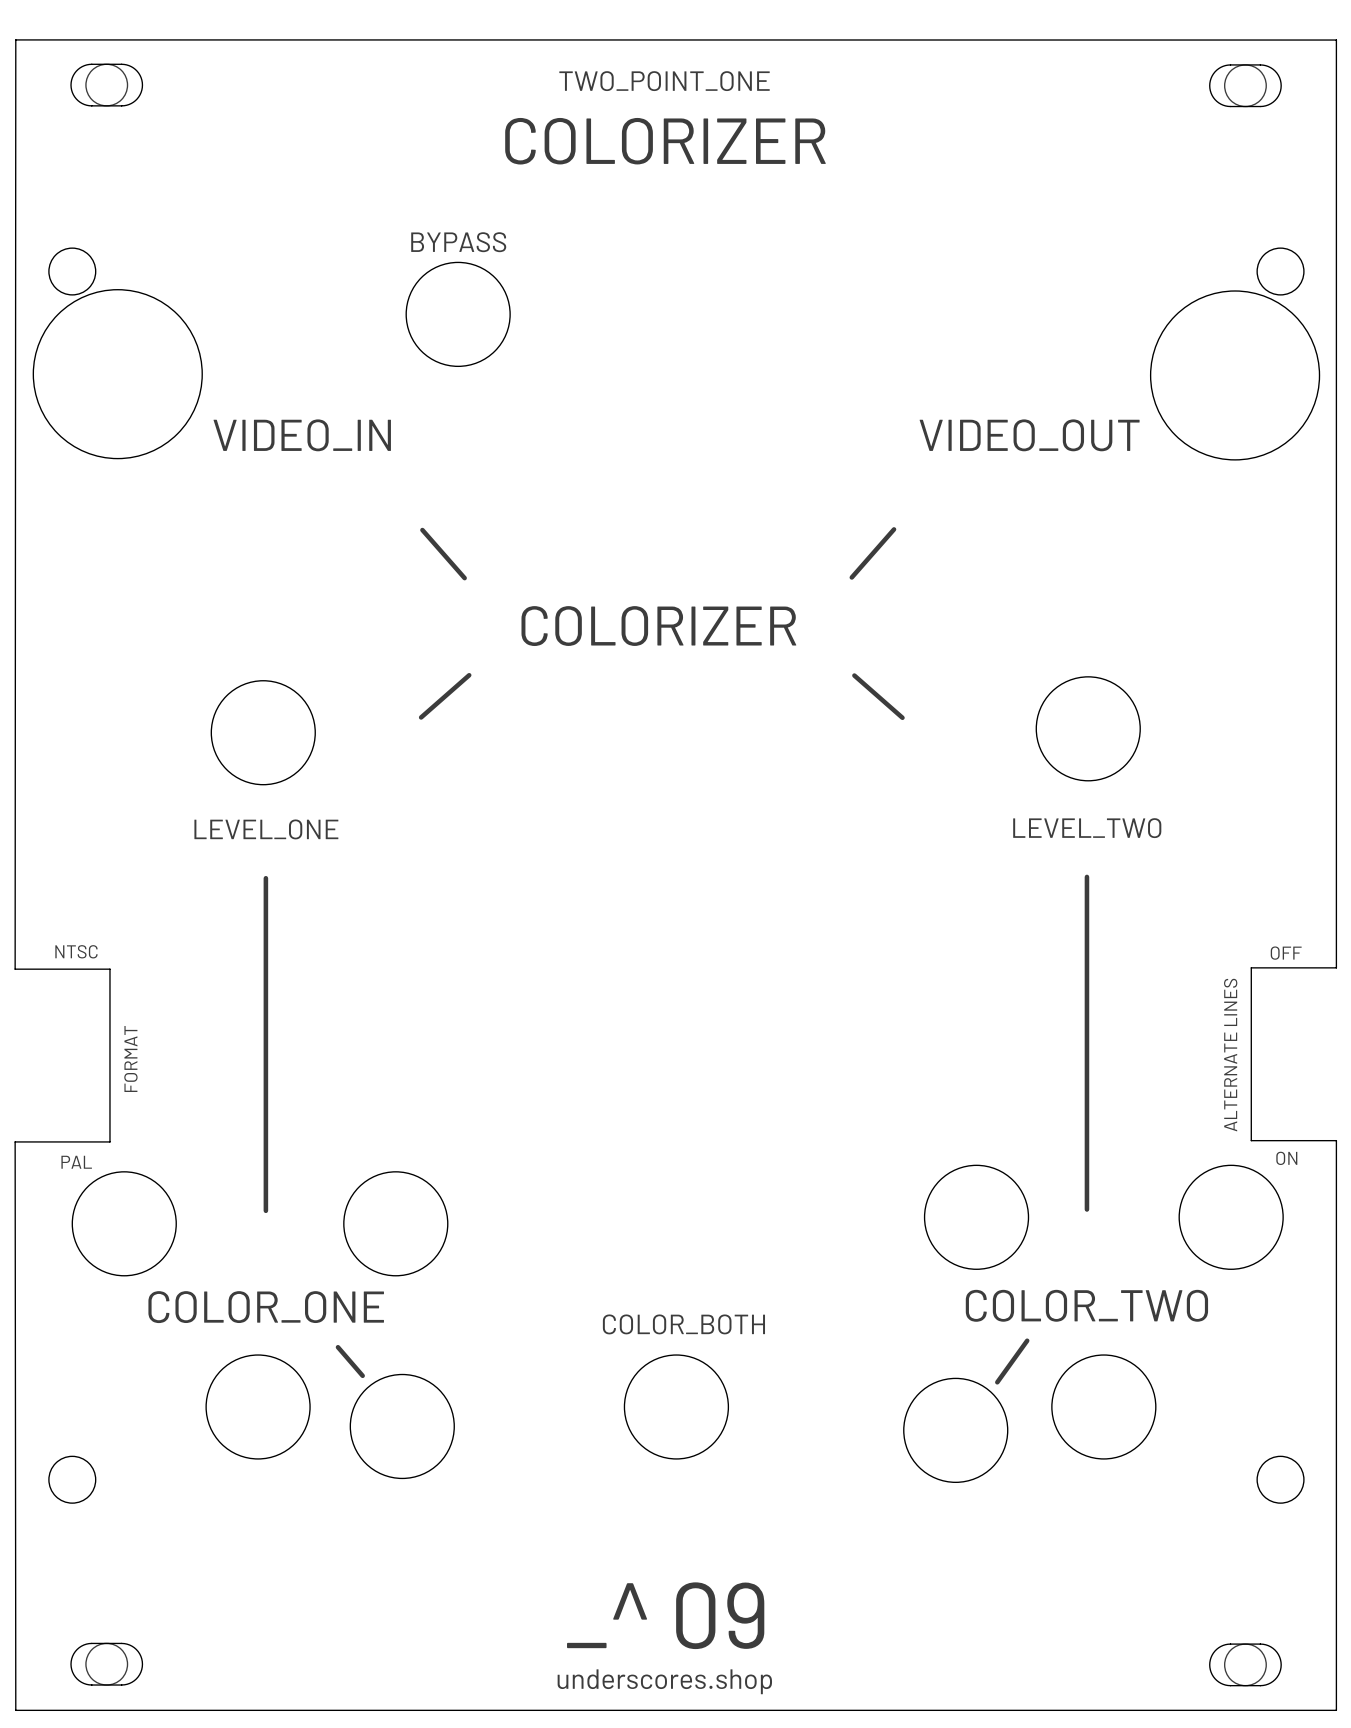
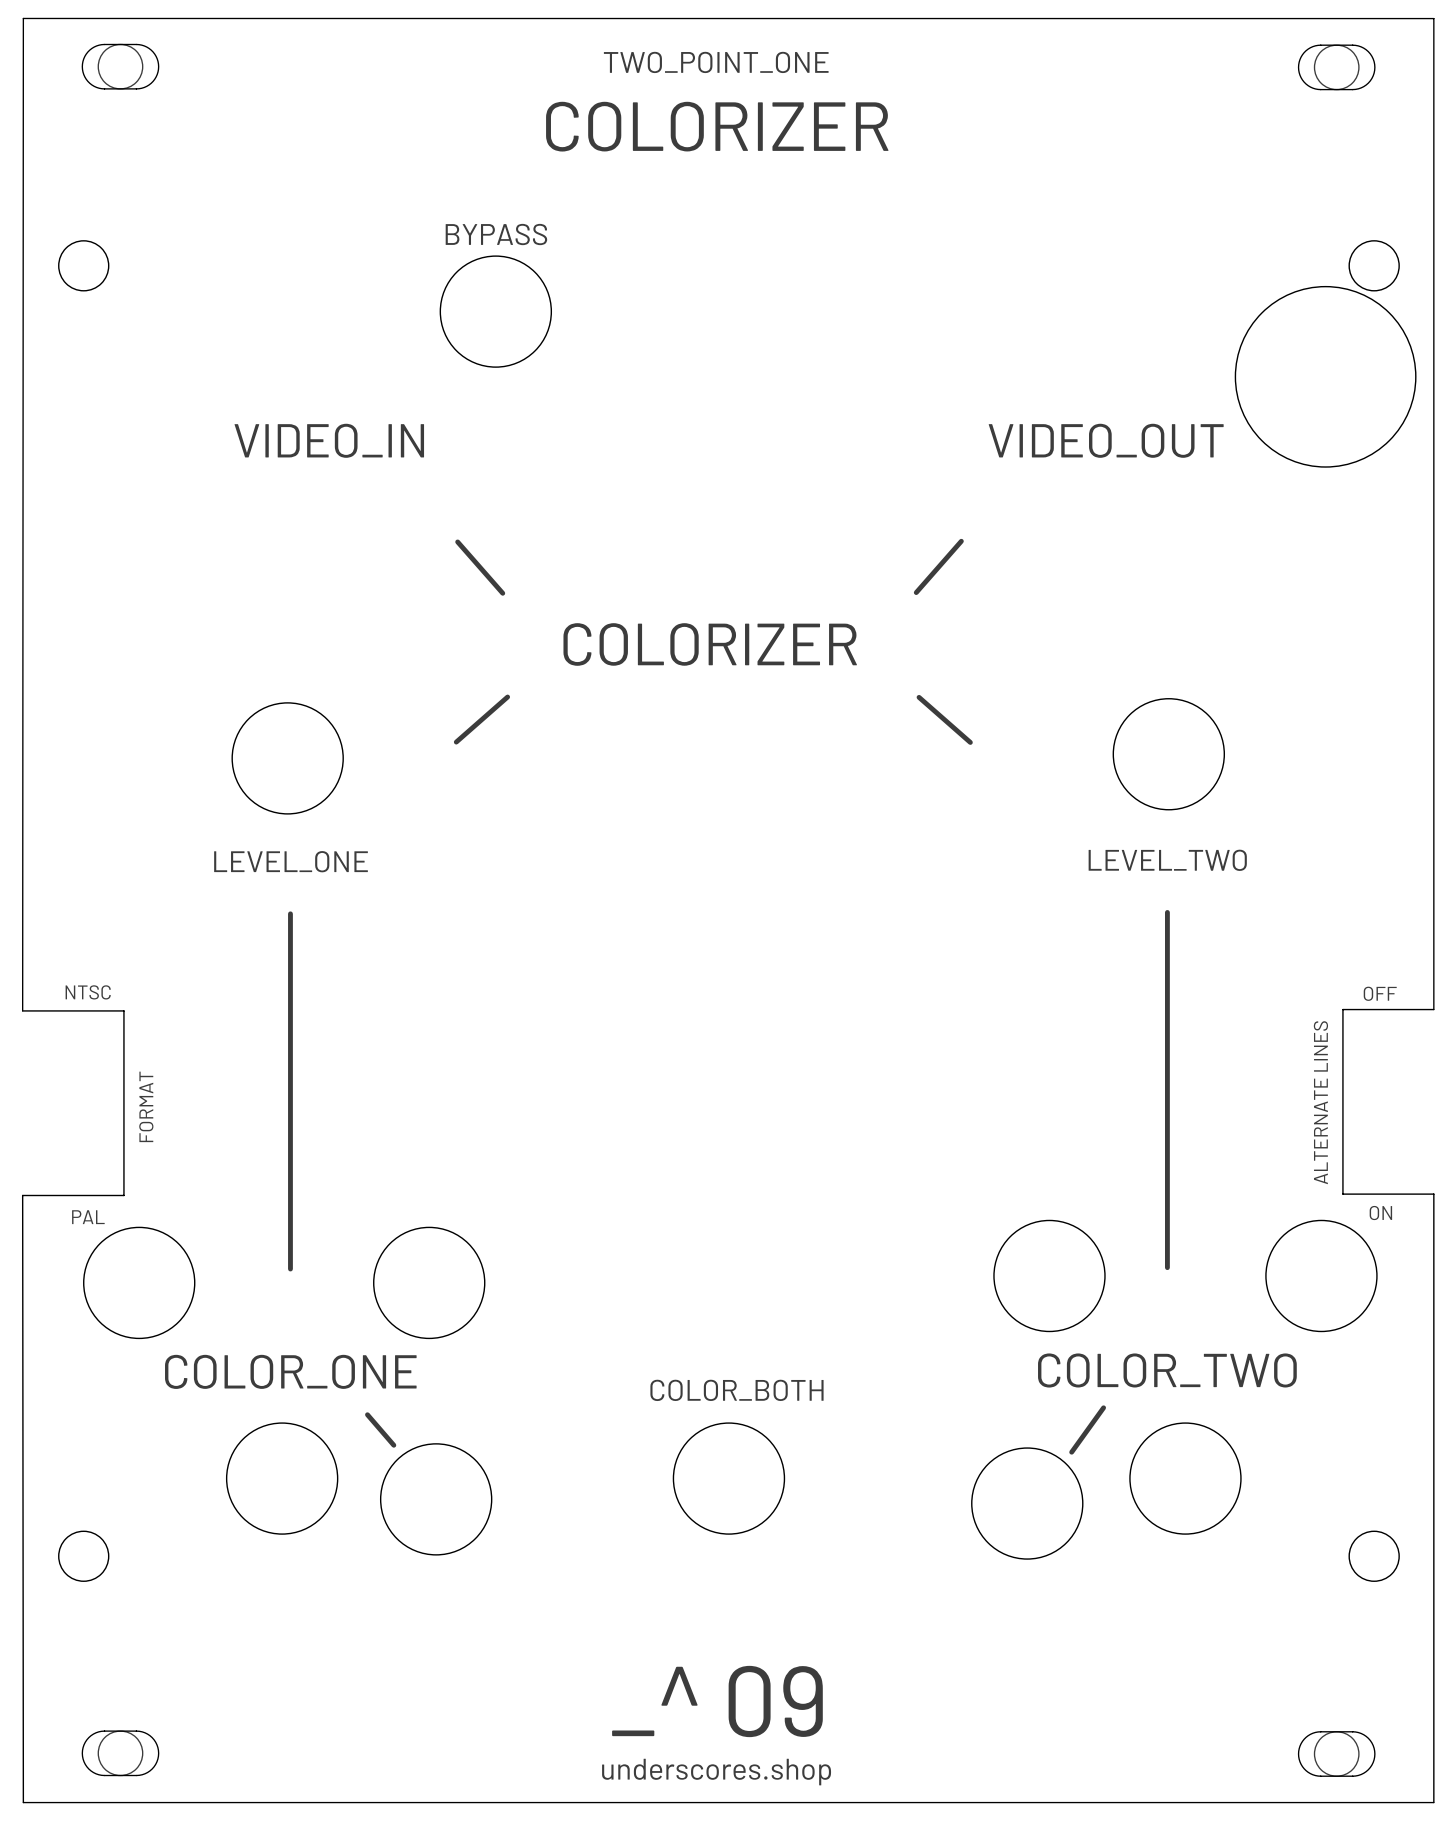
round board edge: [32, 289, 203, 460] -> none

